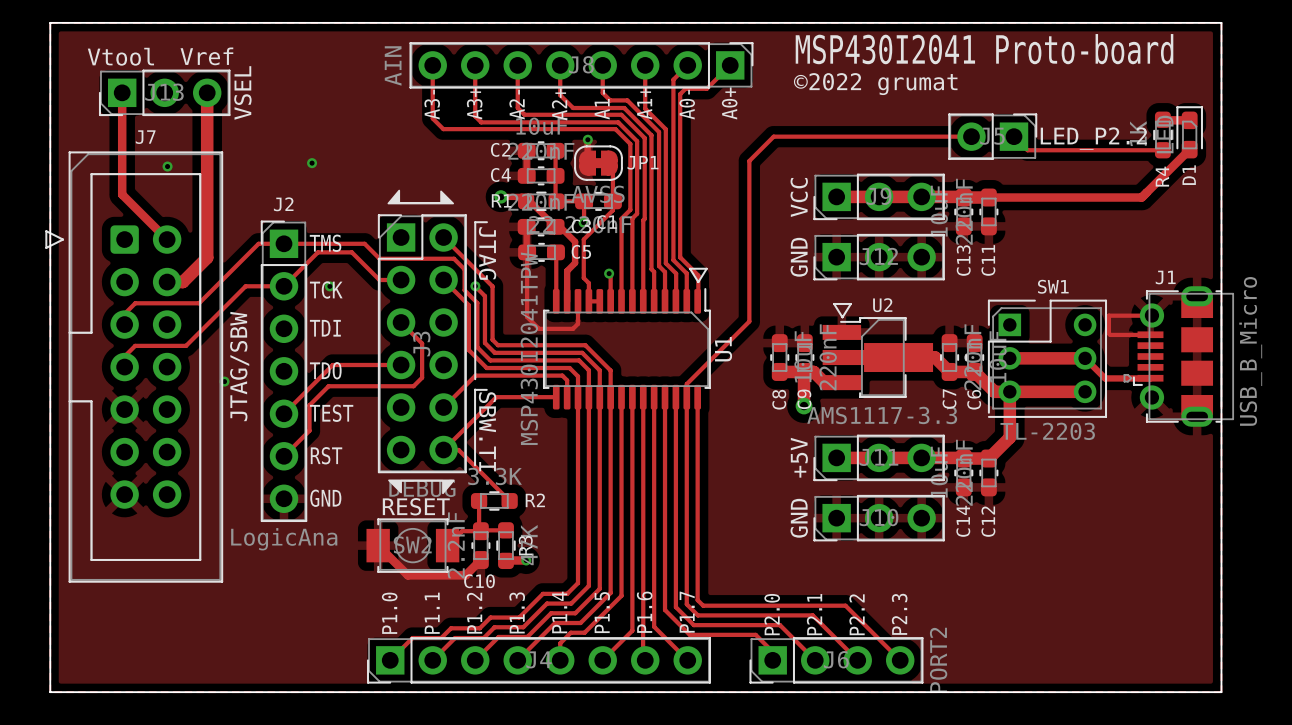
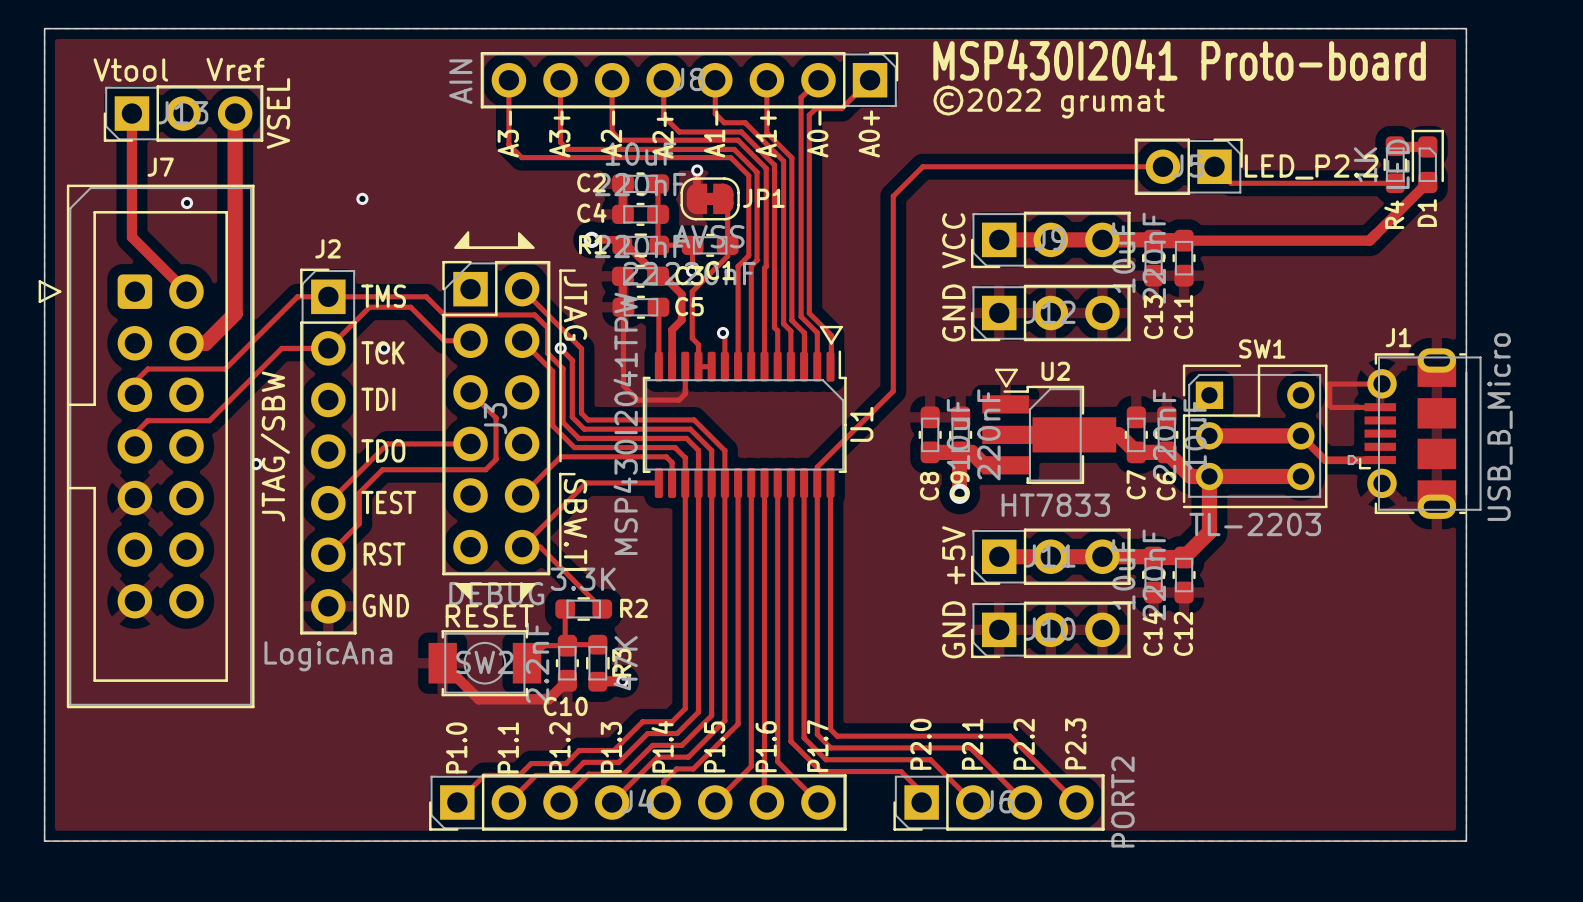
U2 value: AMS1117-3.3 (882, 415) -> HT7833 (1055, 505)

